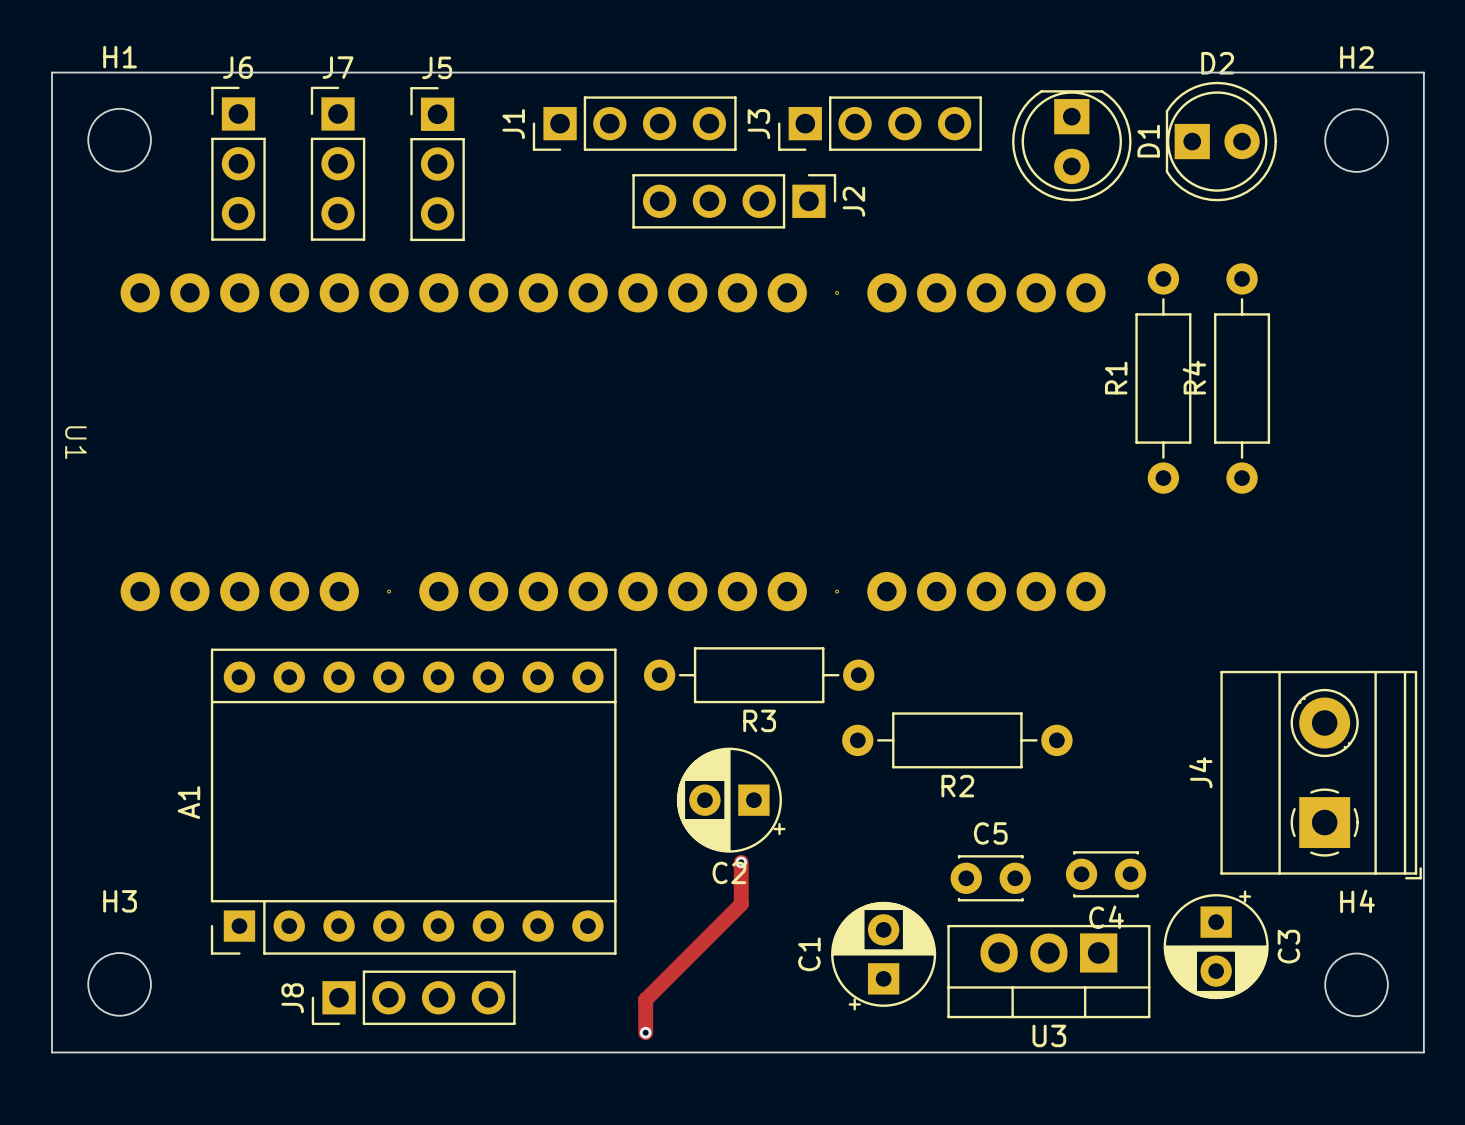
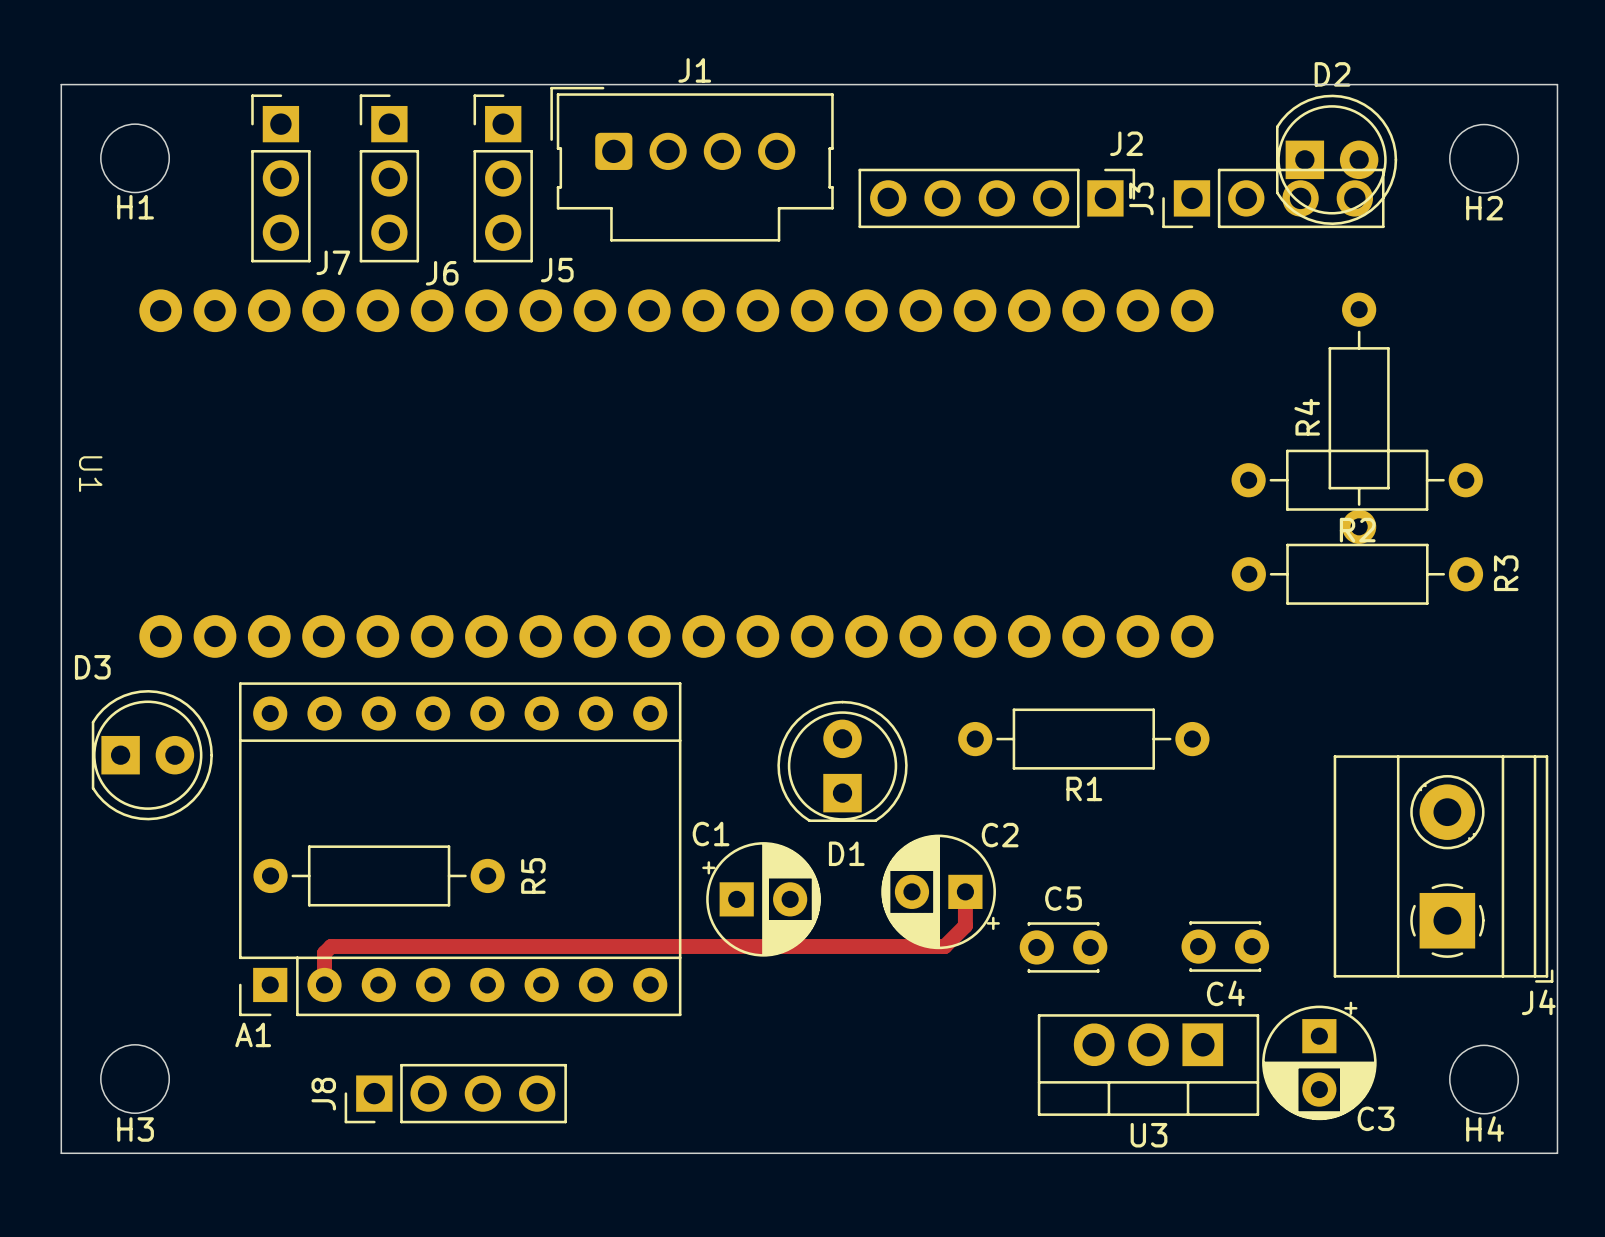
H1 name position: H1 (120, 57) -> H1 (135, 207)
H2 name position: H2 (1357, 57) -> H2 (1484, 208)
J6 name position: J6 (238, 67) -> J6 (442, 273)
J7 name position: J7 (338, 67) -> J7 (333, 262)
J5 name position: J5 (437, 67) -> J5 (557, 270)
J1 footprint: [532, 96, 737, 151] -> [550, 86, 834, 242]
J3 position: (879, 123) -> (1273, 198)
J1 name position: J1 (513, 124) -> J1 (694, 70)
D1 name position: D1 (1148, 141) -> D1 (846, 853)
D1 rotation: 0° (1071, 145) -> 180° (842, 761)
D1 position: (1071, 145) -> (842, 761)
J6 position: (238, 163) -> (389, 178)
J7 position: (338, 163) -> (280, 178)
J5 position: (437, 164) -> (503, 178)
J2 footprint: [632, 174, 837, 229] -> [858, 168, 1136, 229]
J2 name position: J2 (853, 201) -> J2 (1126, 143)
U1 footprint: [120, 273, 1106, 612] -> [139, 289, 1214, 658]
R1 name position: R1 (1116, 378) -> R1 (1084, 788)
R1 rotation: 0° (1163, 378) -> 90° clockwise (1083, 739)
R1 position: (1163, 378) -> (1083, 739)
R3 position: (759, 675) -> (1357, 574)
D3: none -> (152, 755)
R3 name rotation: 0° (759, 720) -> 90° counterclockwise (1506, 573)
R3 name position: R3 (759, 720) -> R3 (1506, 573)
R2 position: (957, 740) -> (1357, 480)
J4 name rotation: 0° (1200, 772) -> 90° clockwise (1538, 1002)
J4 name position: J4 (1200, 772) -> J4 (1538, 1002)
J4 position: (1321, 775) -> (1443, 869)
R5: none -> (379, 875)
C2 position: (731, 800) -> (940, 891)
A1 position: (413, 801) -> (460, 849)
A1 name rotation: 0° (188, 802) -> 90° clockwise (253, 1034)
A1 name position: A1 (188, 802) -> A1 (253, 1034)
track: none -> (965, 891) (965, 925) (944, 946) (331, 946) (324, 953) (324, 984)
track: (741, 862) (741, 904) (645, 999) (645, 1032) -> none
via: (741, 862) -> none
C2 name position: C2 (729, 872) -> C2 (1000, 835)
C4 position: (1106, 874) -> (1225, 946)
C5 position: (990, 878) -> (1063, 947)
H3 name position: H3 (120, 901) -> H3 (135, 1129)
H4 name position: H4 (1357, 901) -> H4 (1485, 1129)
C3 position: (1216, 944) -> (1319, 1060)
C3 name rotation: 0° (1288, 946) -> 90° clockwise (1376, 1118)
C3 name position: C3 (1288, 946) -> C3 (1376, 1118)
C1 name position: C1 (809, 954) -> C1 (711, 834)
C1 rotation: 0° (883, 956) -> 90° clockwise (761, 899)
C1 position: (883, 956) -> (761, 899)
via: (645, 1032) -> none

